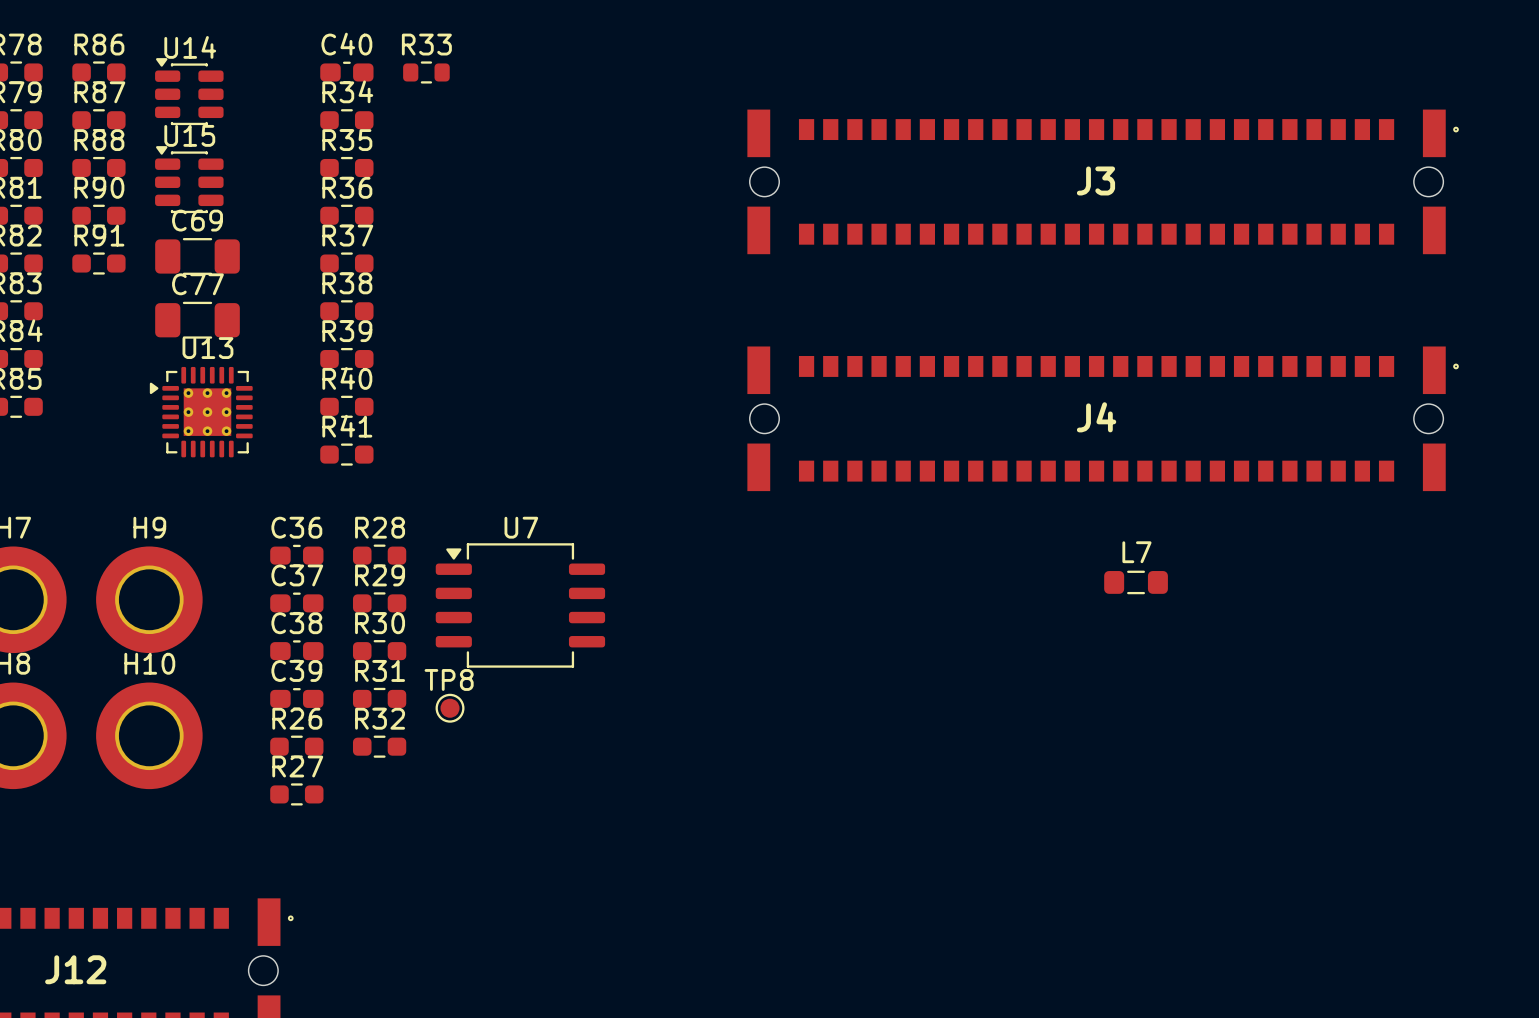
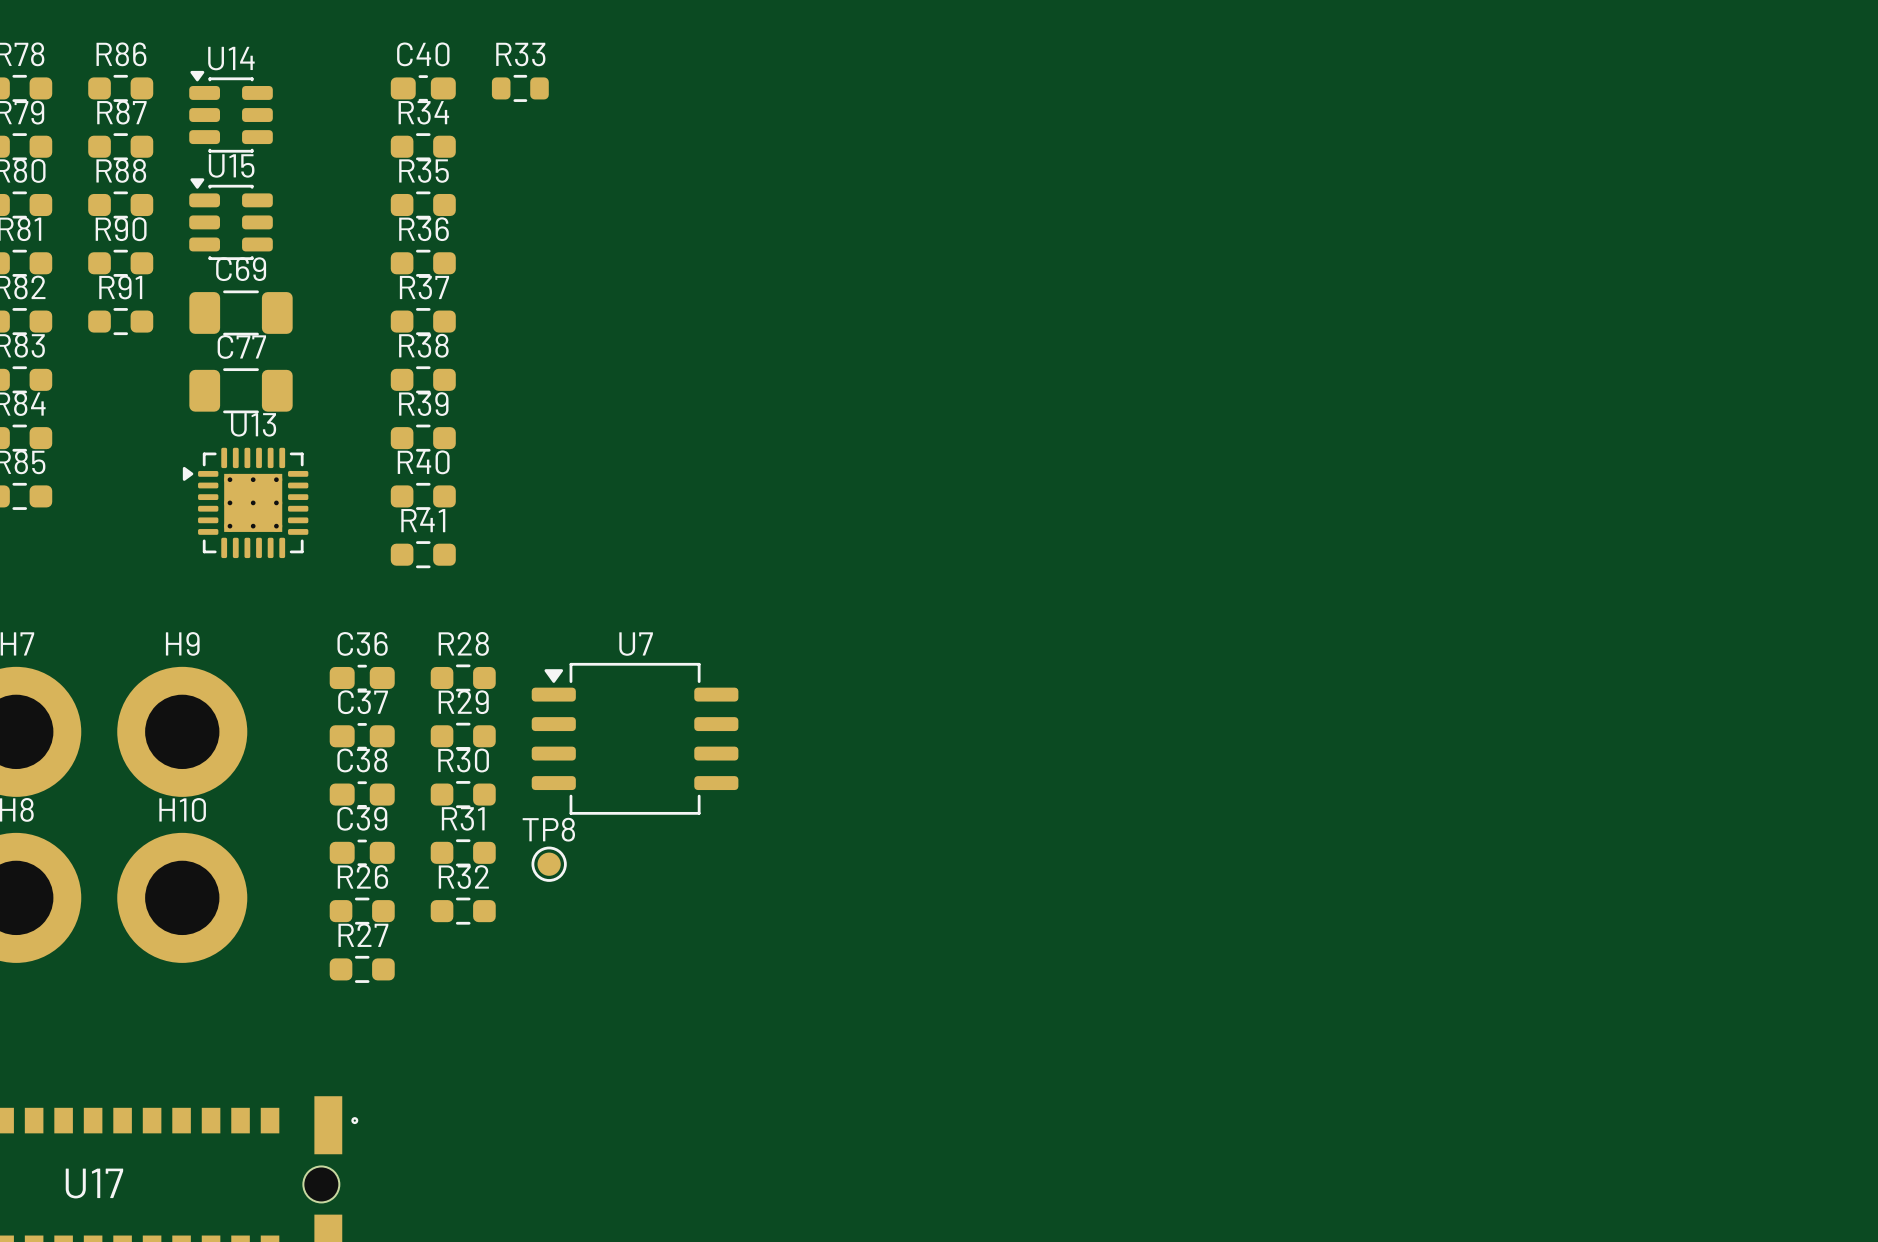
J3: (1103, 181) -> none
J4: (1103, 418) -> none
L7: (1136, 582) -> none
J12 name: J12 (75, 969) -> U17 (94, 1183)

